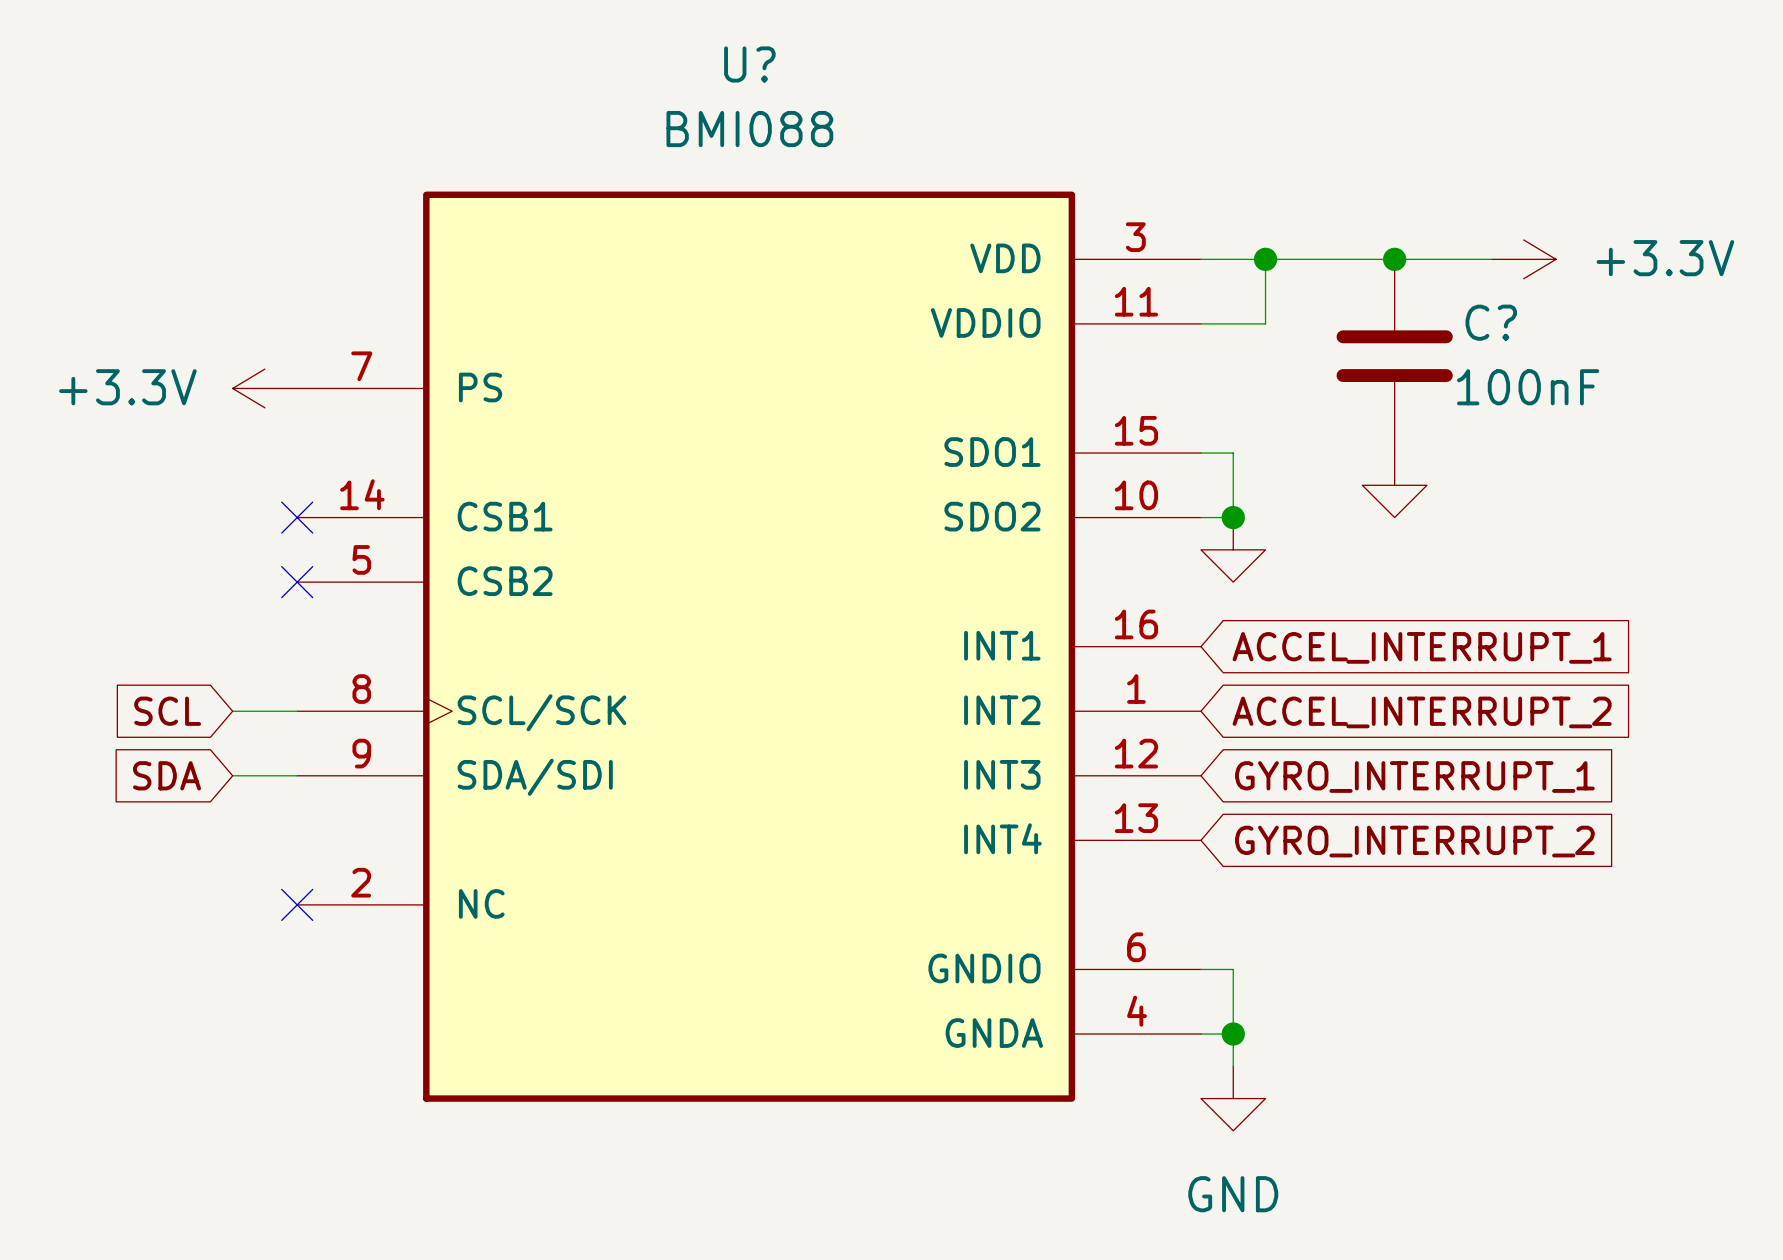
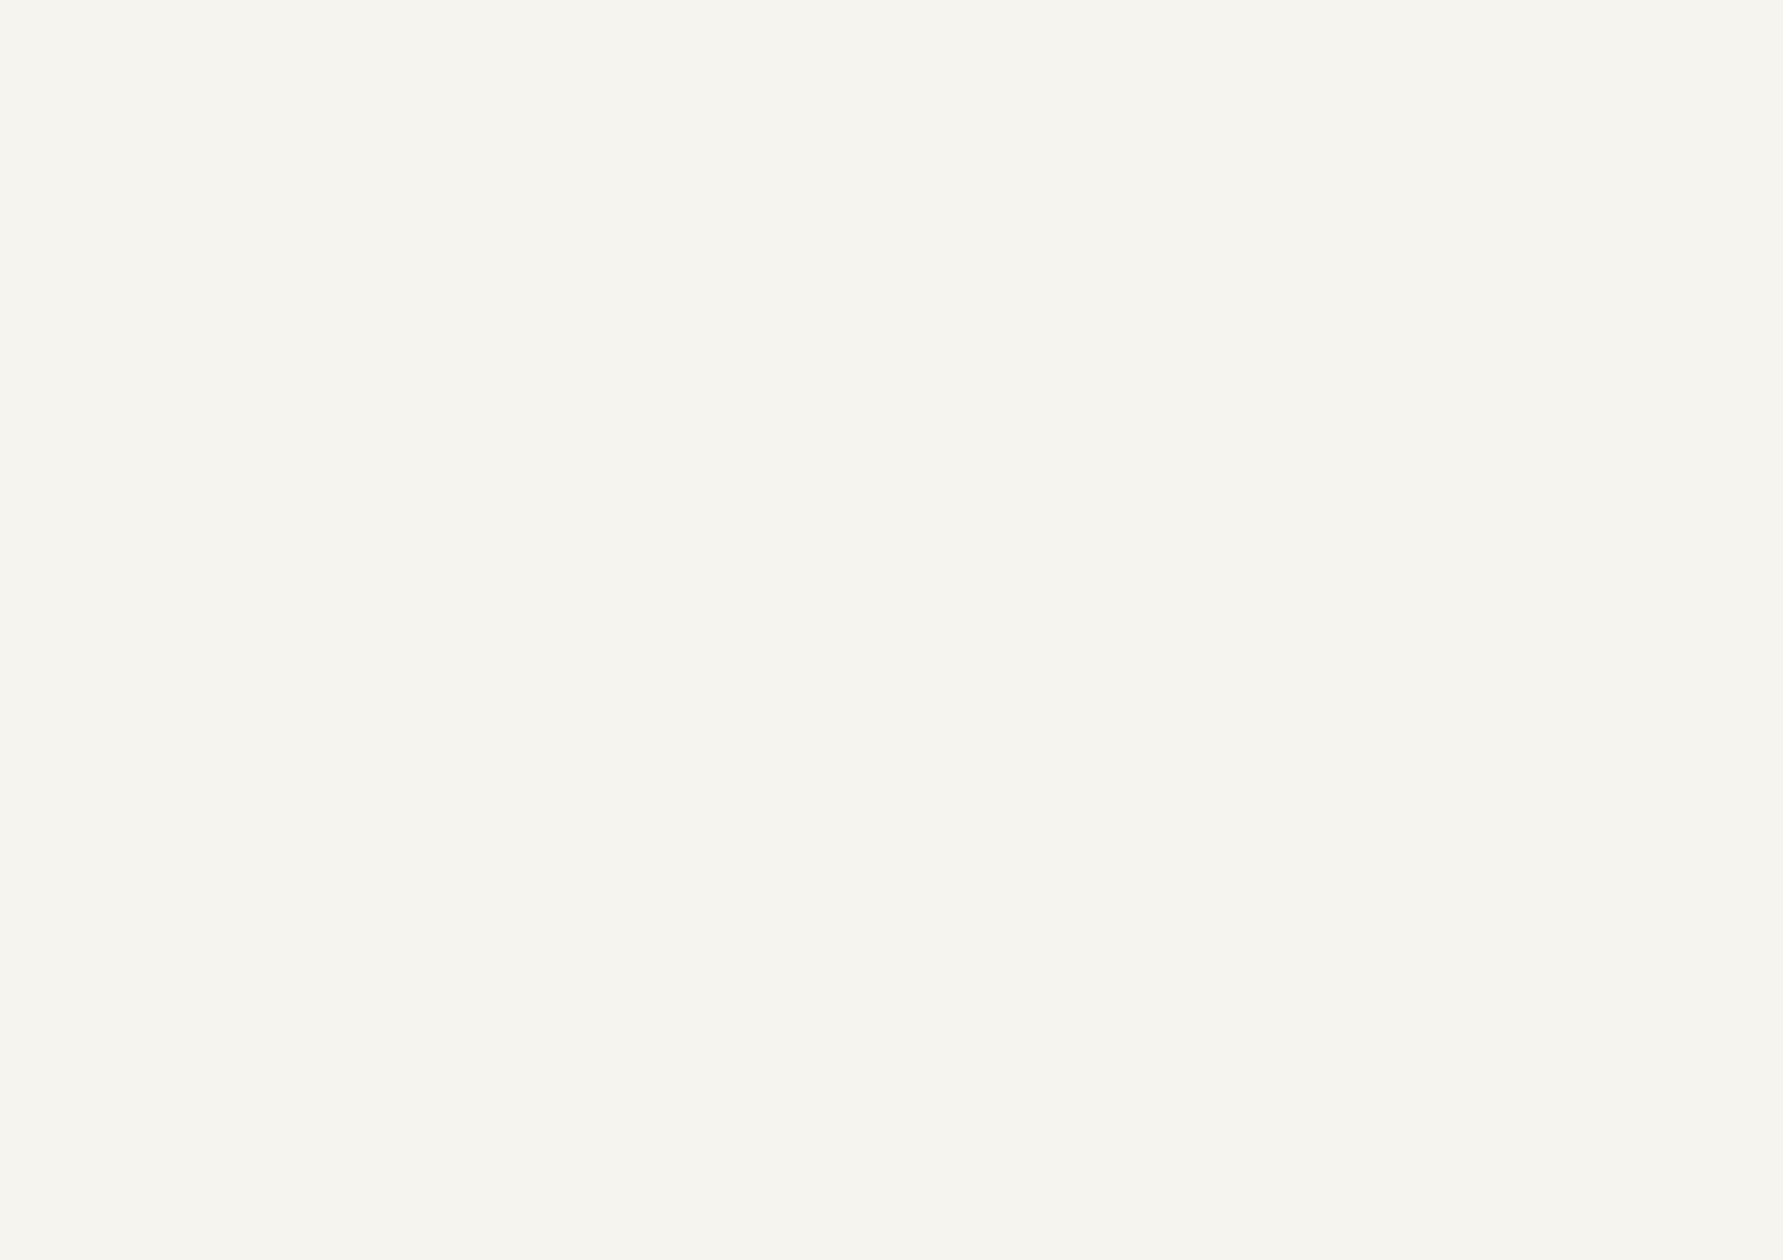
wire: (1200, 259) (1491, 259) -> none
wire: (1265, 259) (1265, 323) (1200, 323) -> none
junction: (1265, 259) -> none
junction: (1394, 259) -> none
power symbol: +3.3V (1523, 259) -> none
C?: 100nF (1394, 356) -> none
power symbol: +3.3V (264, 388) -> none
wire: (1200, 453) (1233, 453) (1233, 517) (1200, 517) -> none
power symbol: (1394, 485) -> none
no-connect mark: (297, 517) -> none
junction: (1233, 517) -> none
power symbol: (1233, 549) -> none
no-connect mark: (297, 582) -> none
U?: BMI088 (749, 646) -> none
global label: ACCEL_INTERRUPT_1 (1422, 647) -> none
global label: SCL (167, 711) -> none
wire: (232, 711) (297, 711) -> none
global label: ACCEL_INTERRUPT_2 (1422, 712) -> none
global label: SDA (167, 775) -> none
wire: (232, 775) (297, 775) -> none
global label: GYRO_INTERRUPT_1 (1414, 777) -> none
global label: GYRO_INTERRUPT_2 (1414, 841) -> none
no-connect mark: (297, 904) -> none
wire: (1200, 969) (1233, 969) (1233, 1066) -> none
wire: (1200, 1034) (1233, 1034) -> none
junction: (1233, 1034) -> none
power symbol: GND (1233, 1098) -> none

